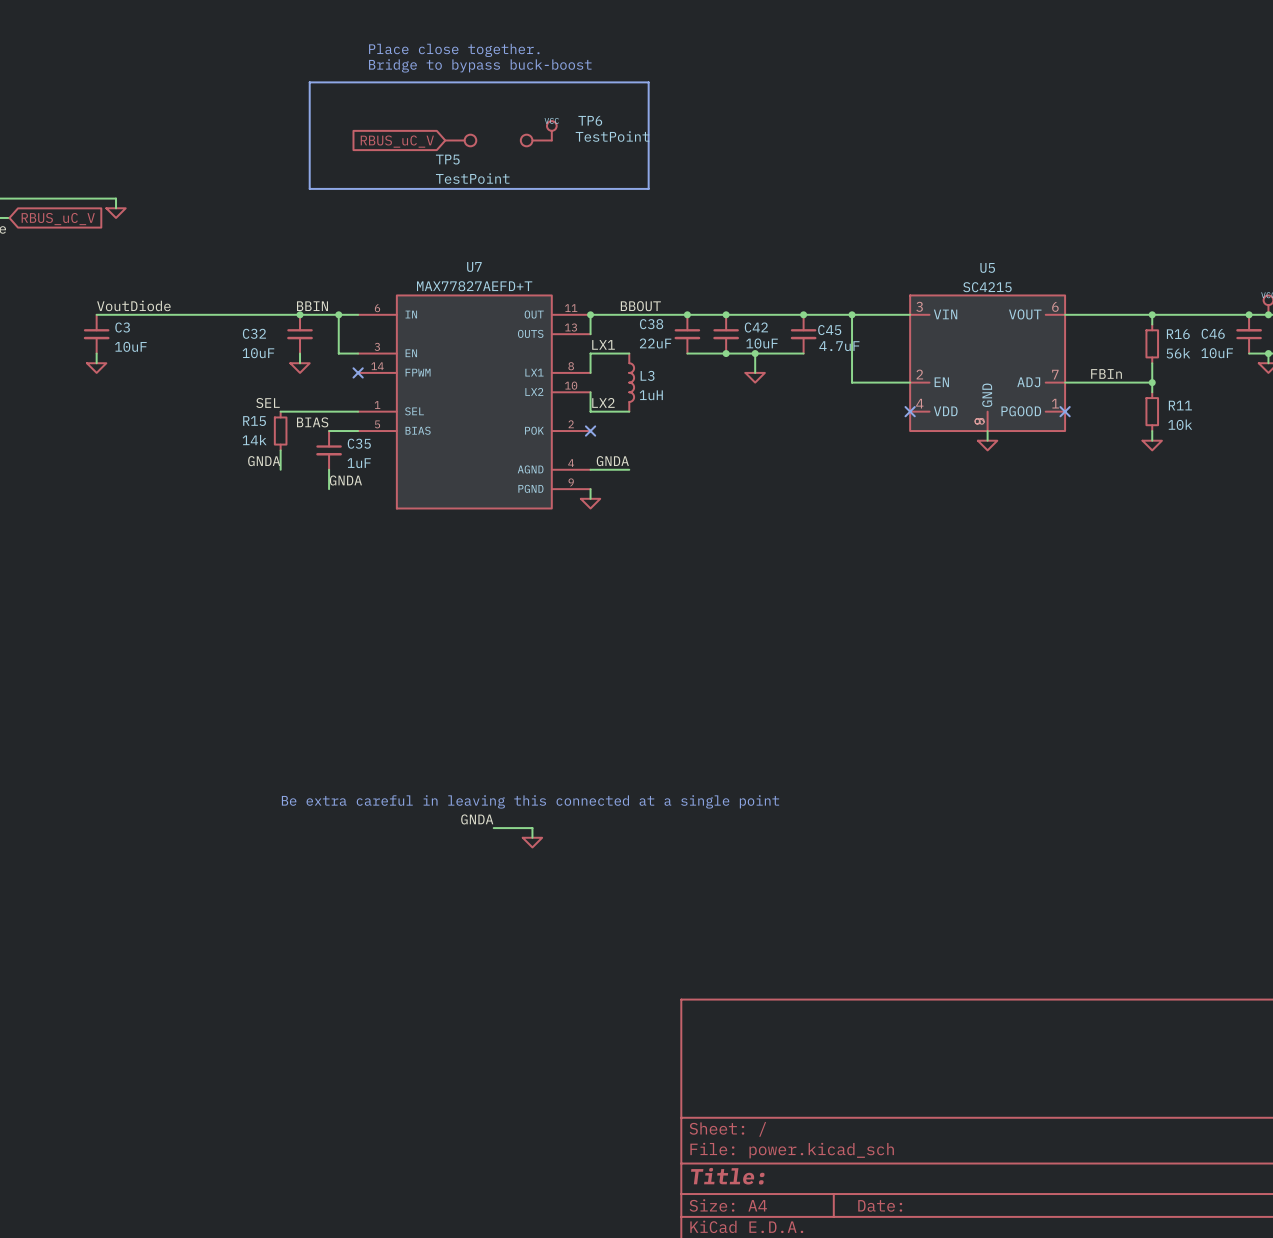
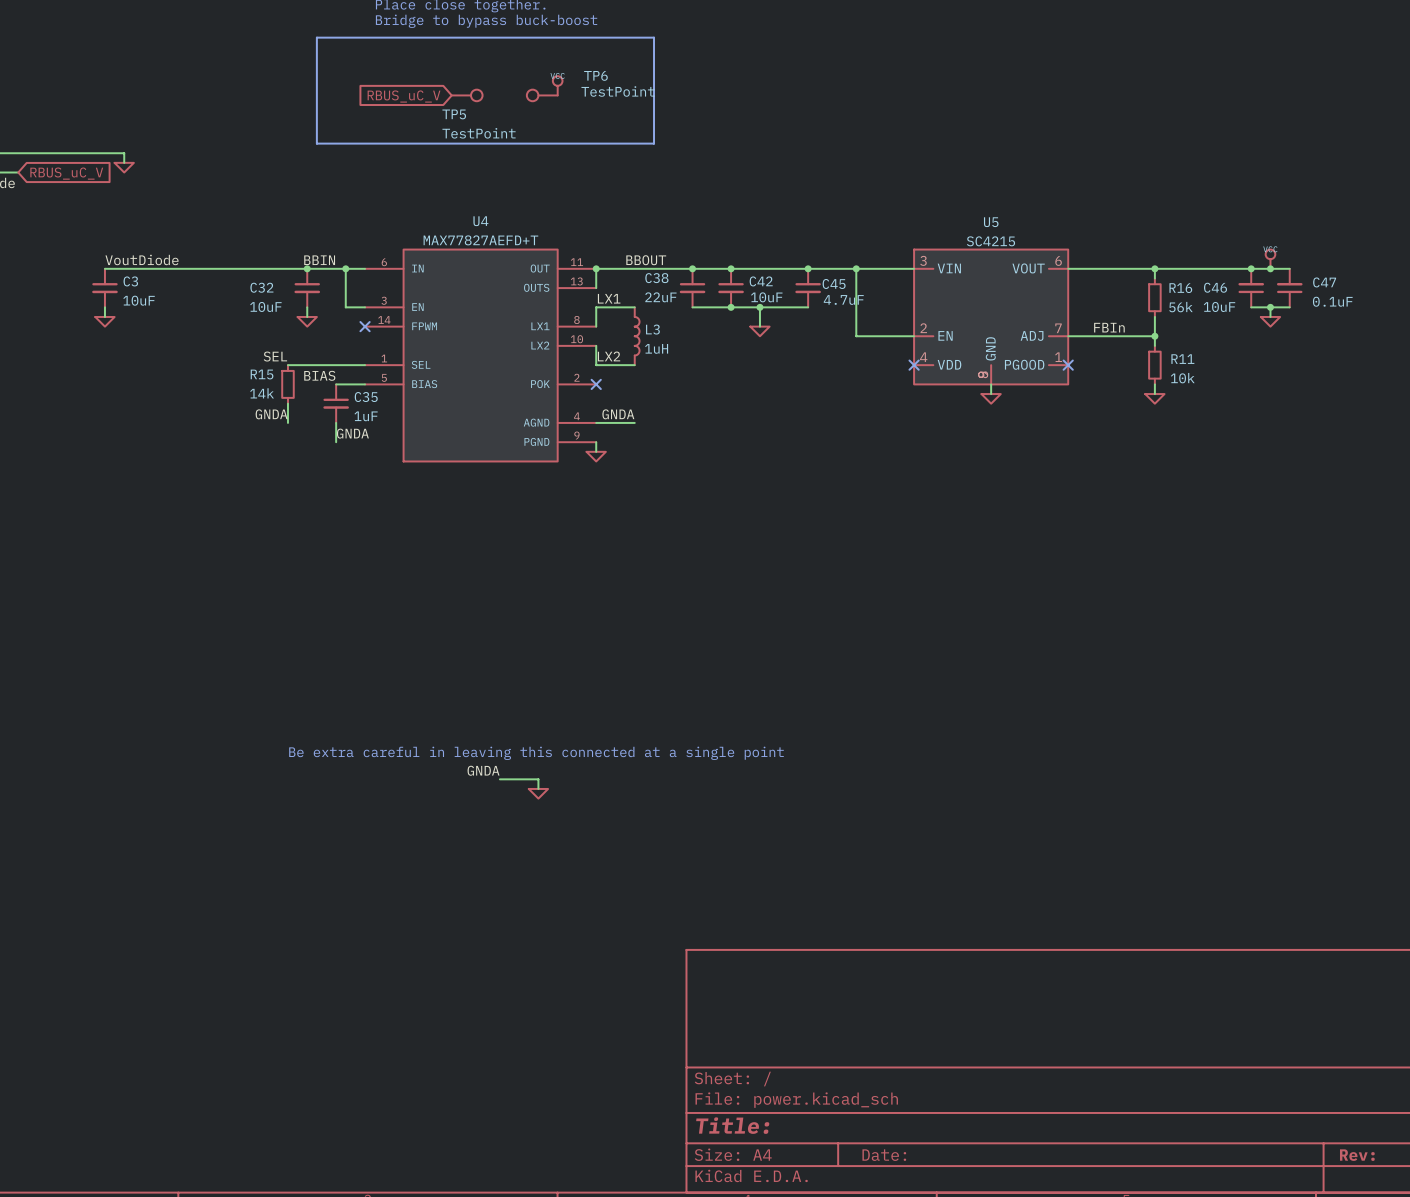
U7 name: U7 (474, 266) -> U4 (480, 221)

